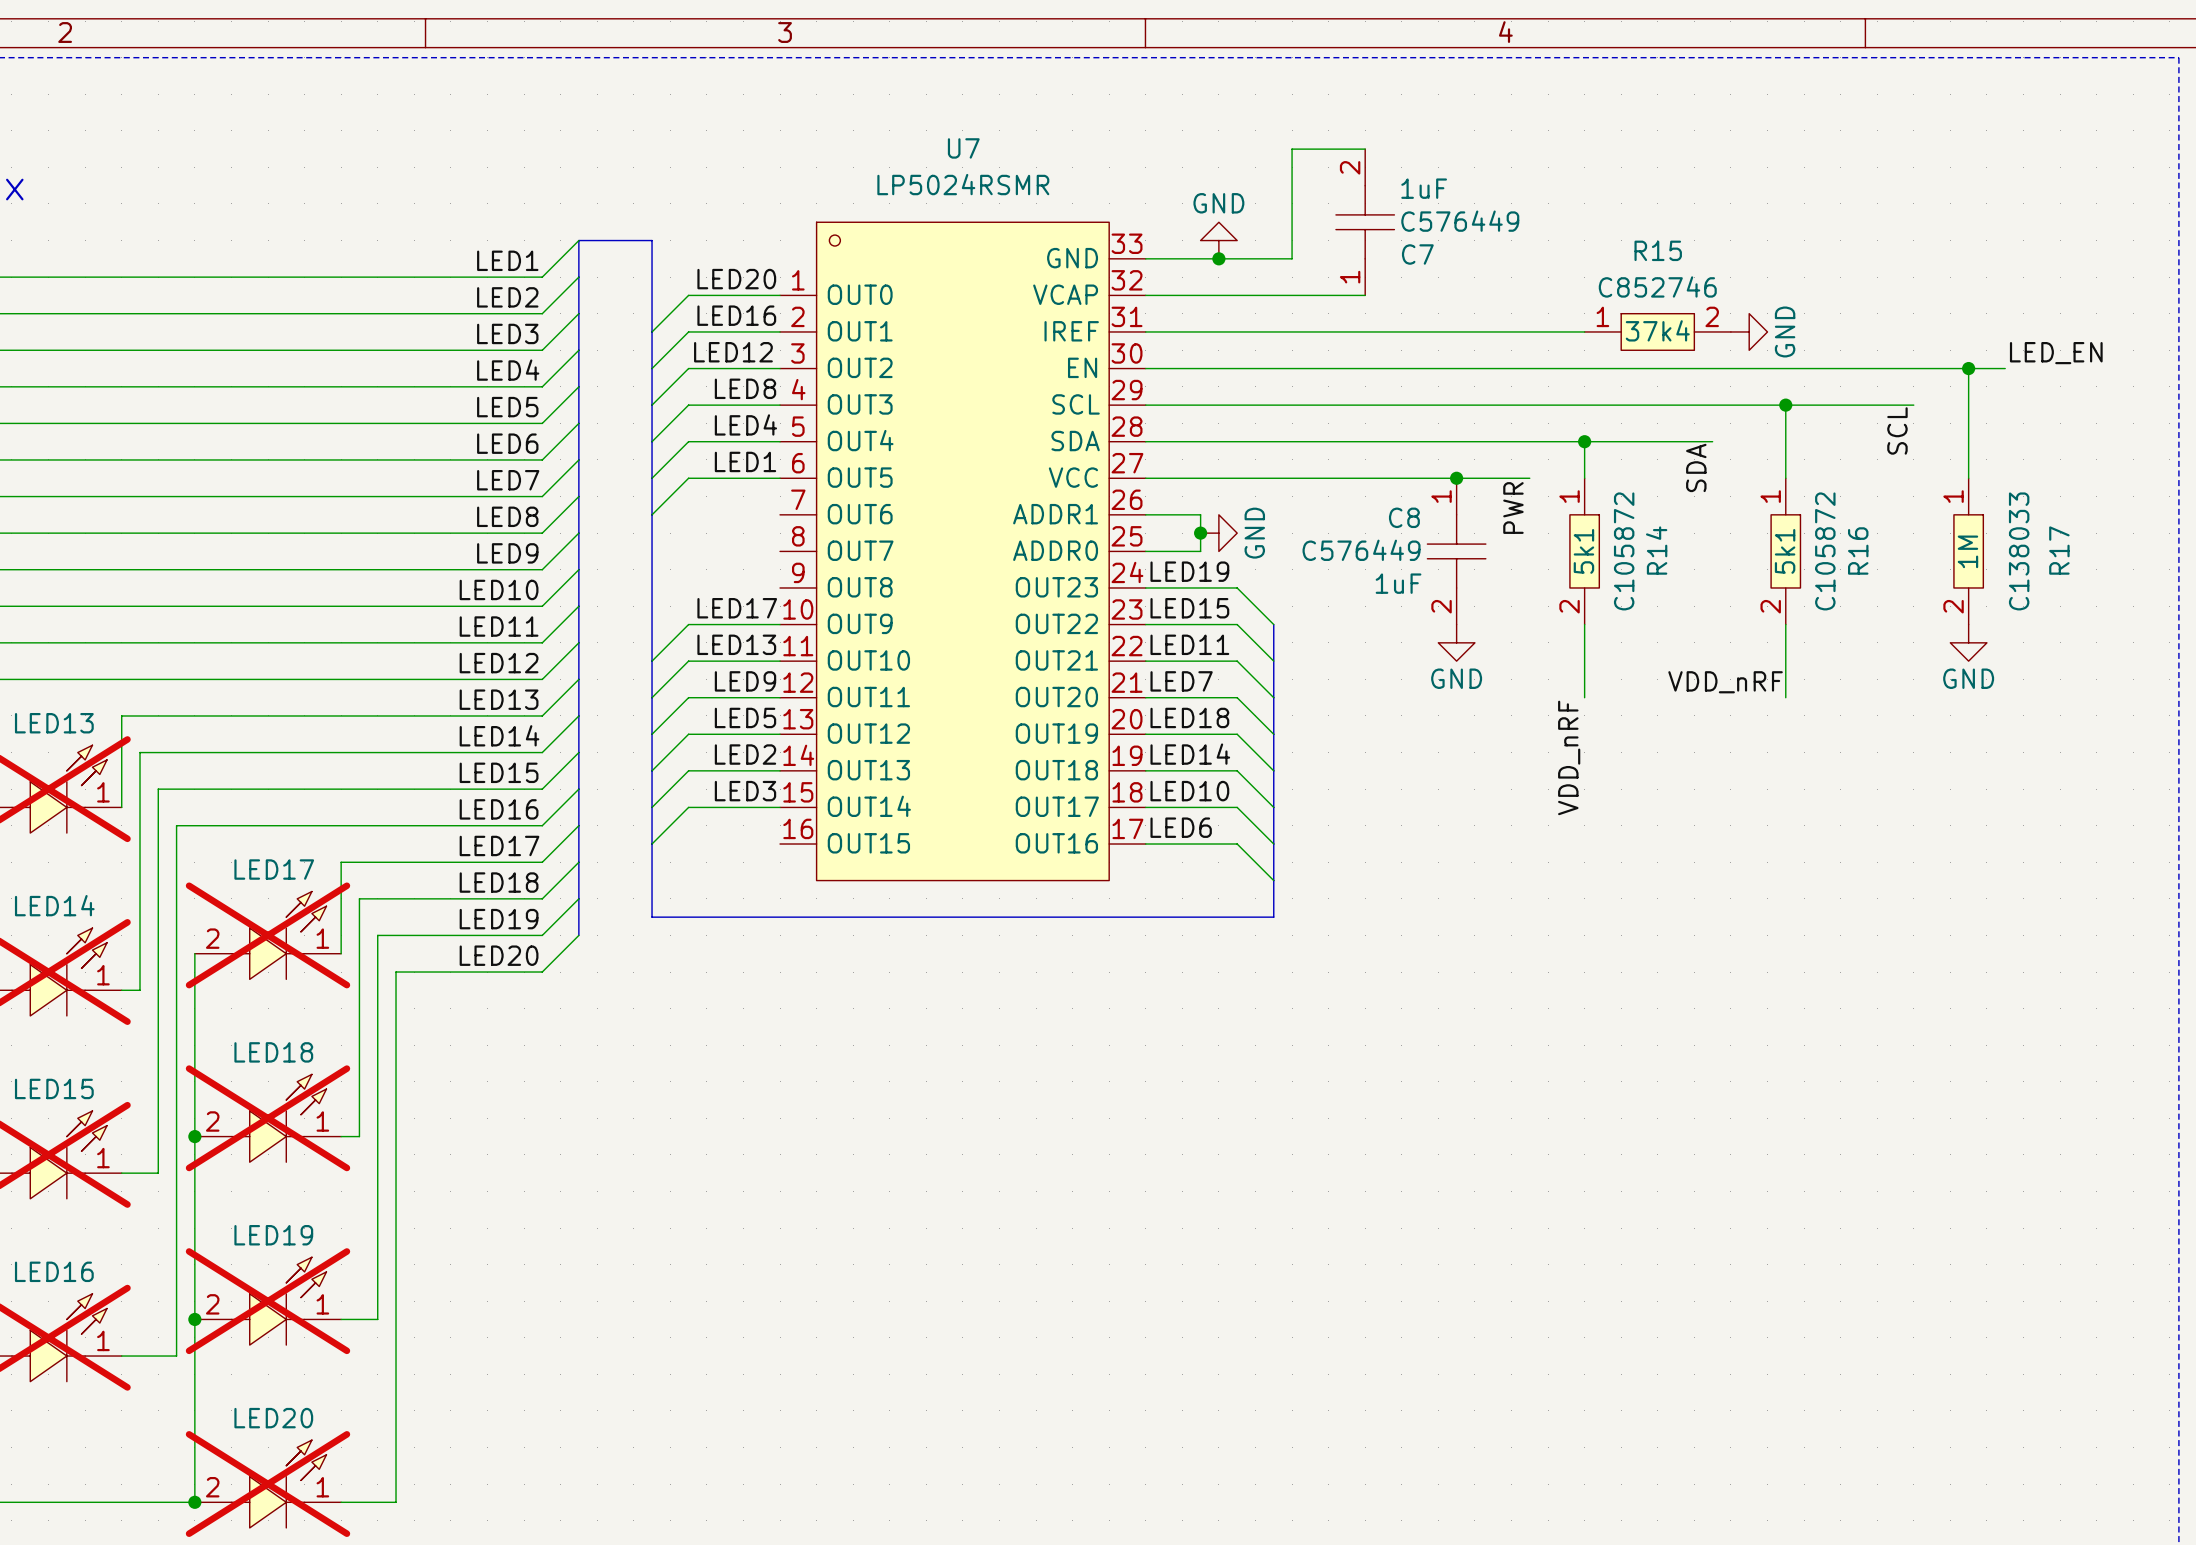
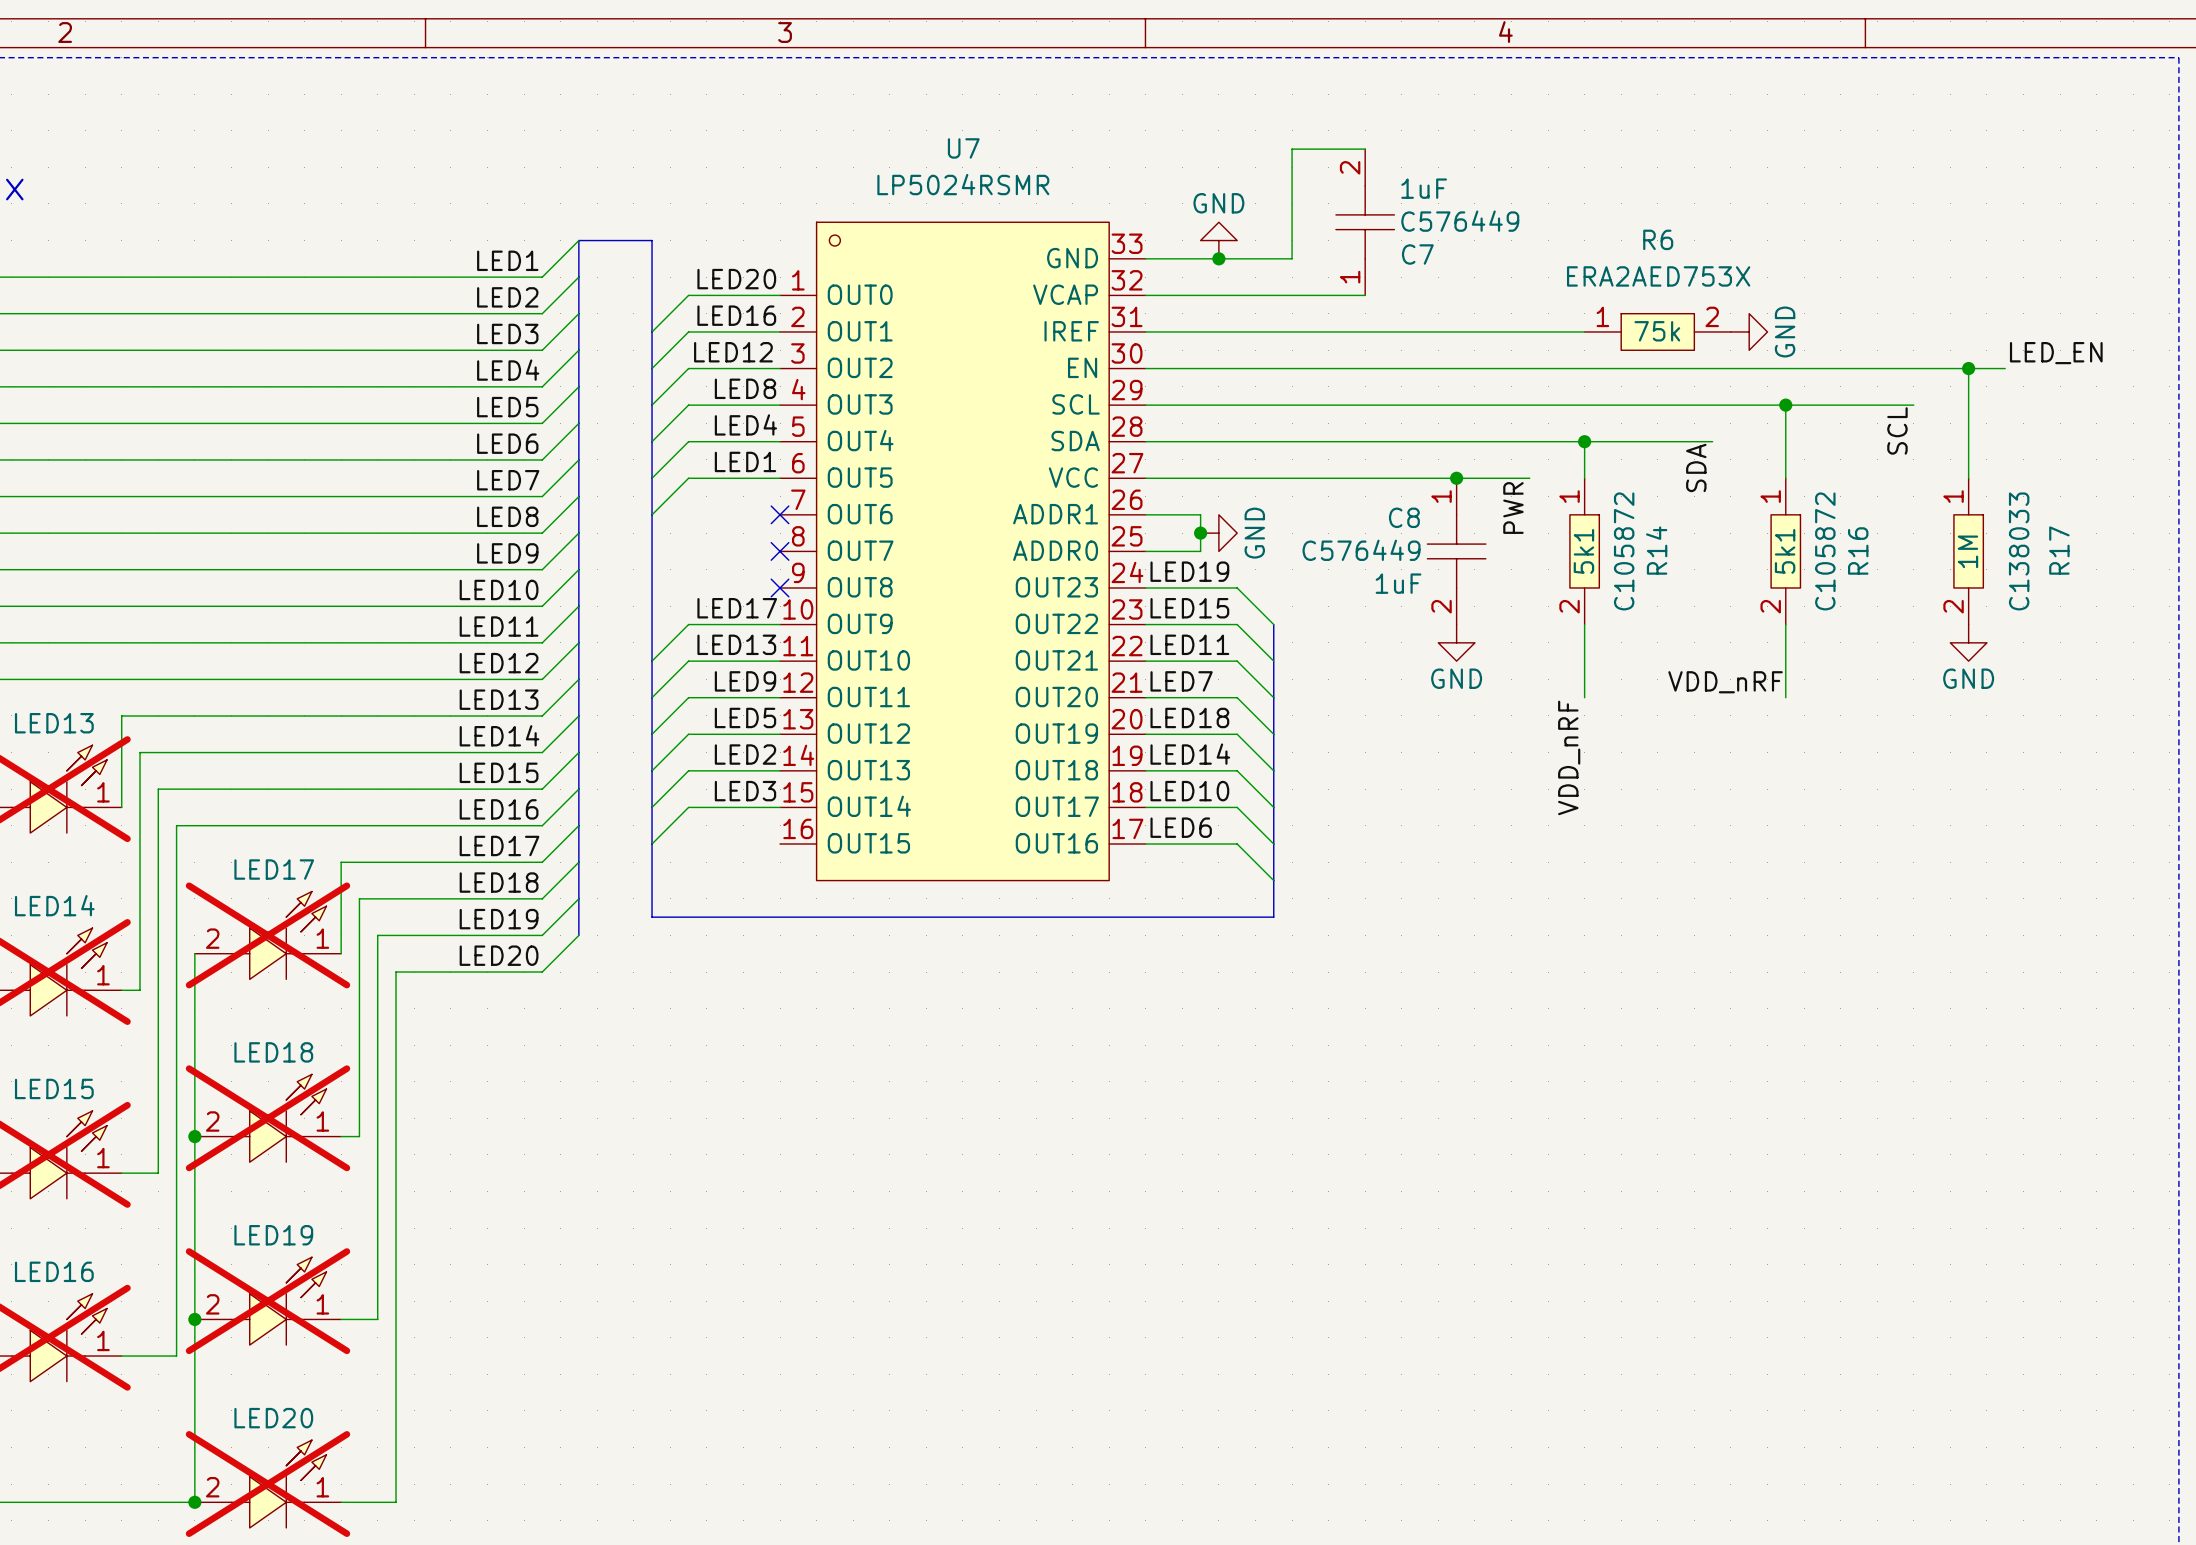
R15 name: R15 (1658, 250) -> R6 (1658, 239)
R15 value: none -> ERA2AED753X (1658, 276)
R15 text: C852746 (1657, 286) -> none
R15 text: 37k4 (1657, 330) -> 75k (1657, 331)
no-connect mark: none -> (780, 514)
no-connect mark: none -> (780, 551)
no-connect mark: none -> (780, 587)

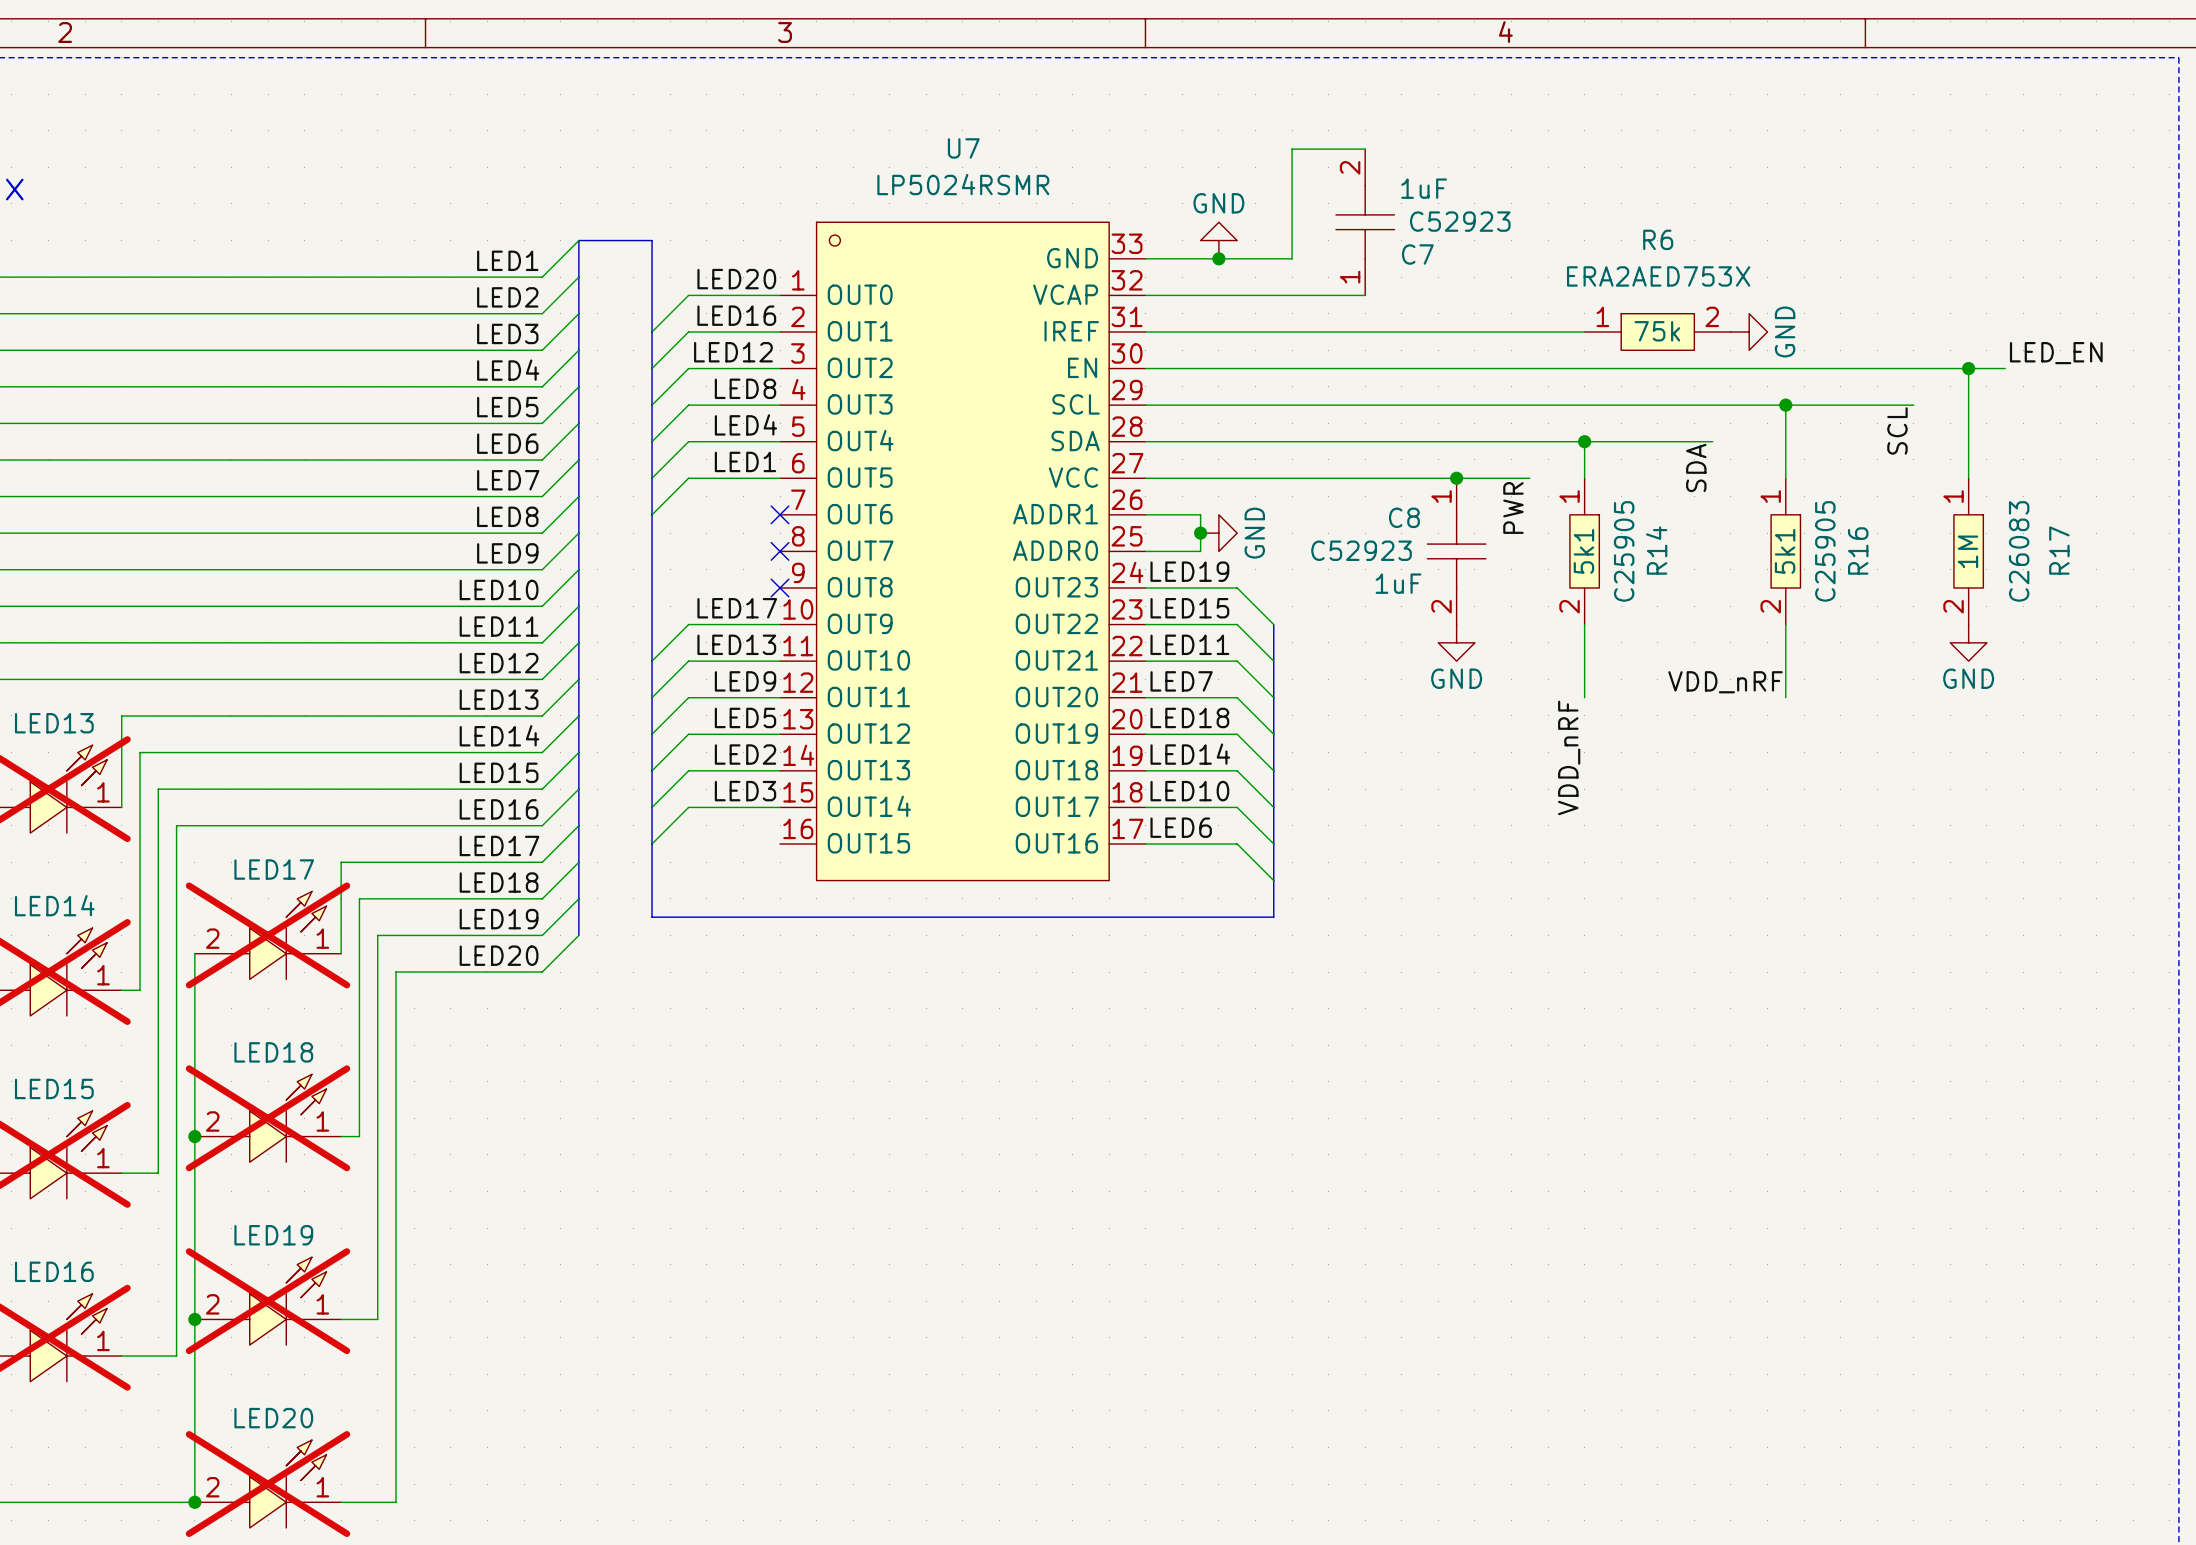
C7 text: C576449 (1460, 221) -> C52923 (1460, 221)
C8 text: C576449 (1361, 550) -> C52923 (1361, 550)
R14 text: C105872 (1624, 551) -> C25905 (1624, 551)
R16 text: C105872 (1825, 551) -> C25905 (1825, 551)
R17 text: C138033 (2019, 551) -> C26083 (2019, 551)

